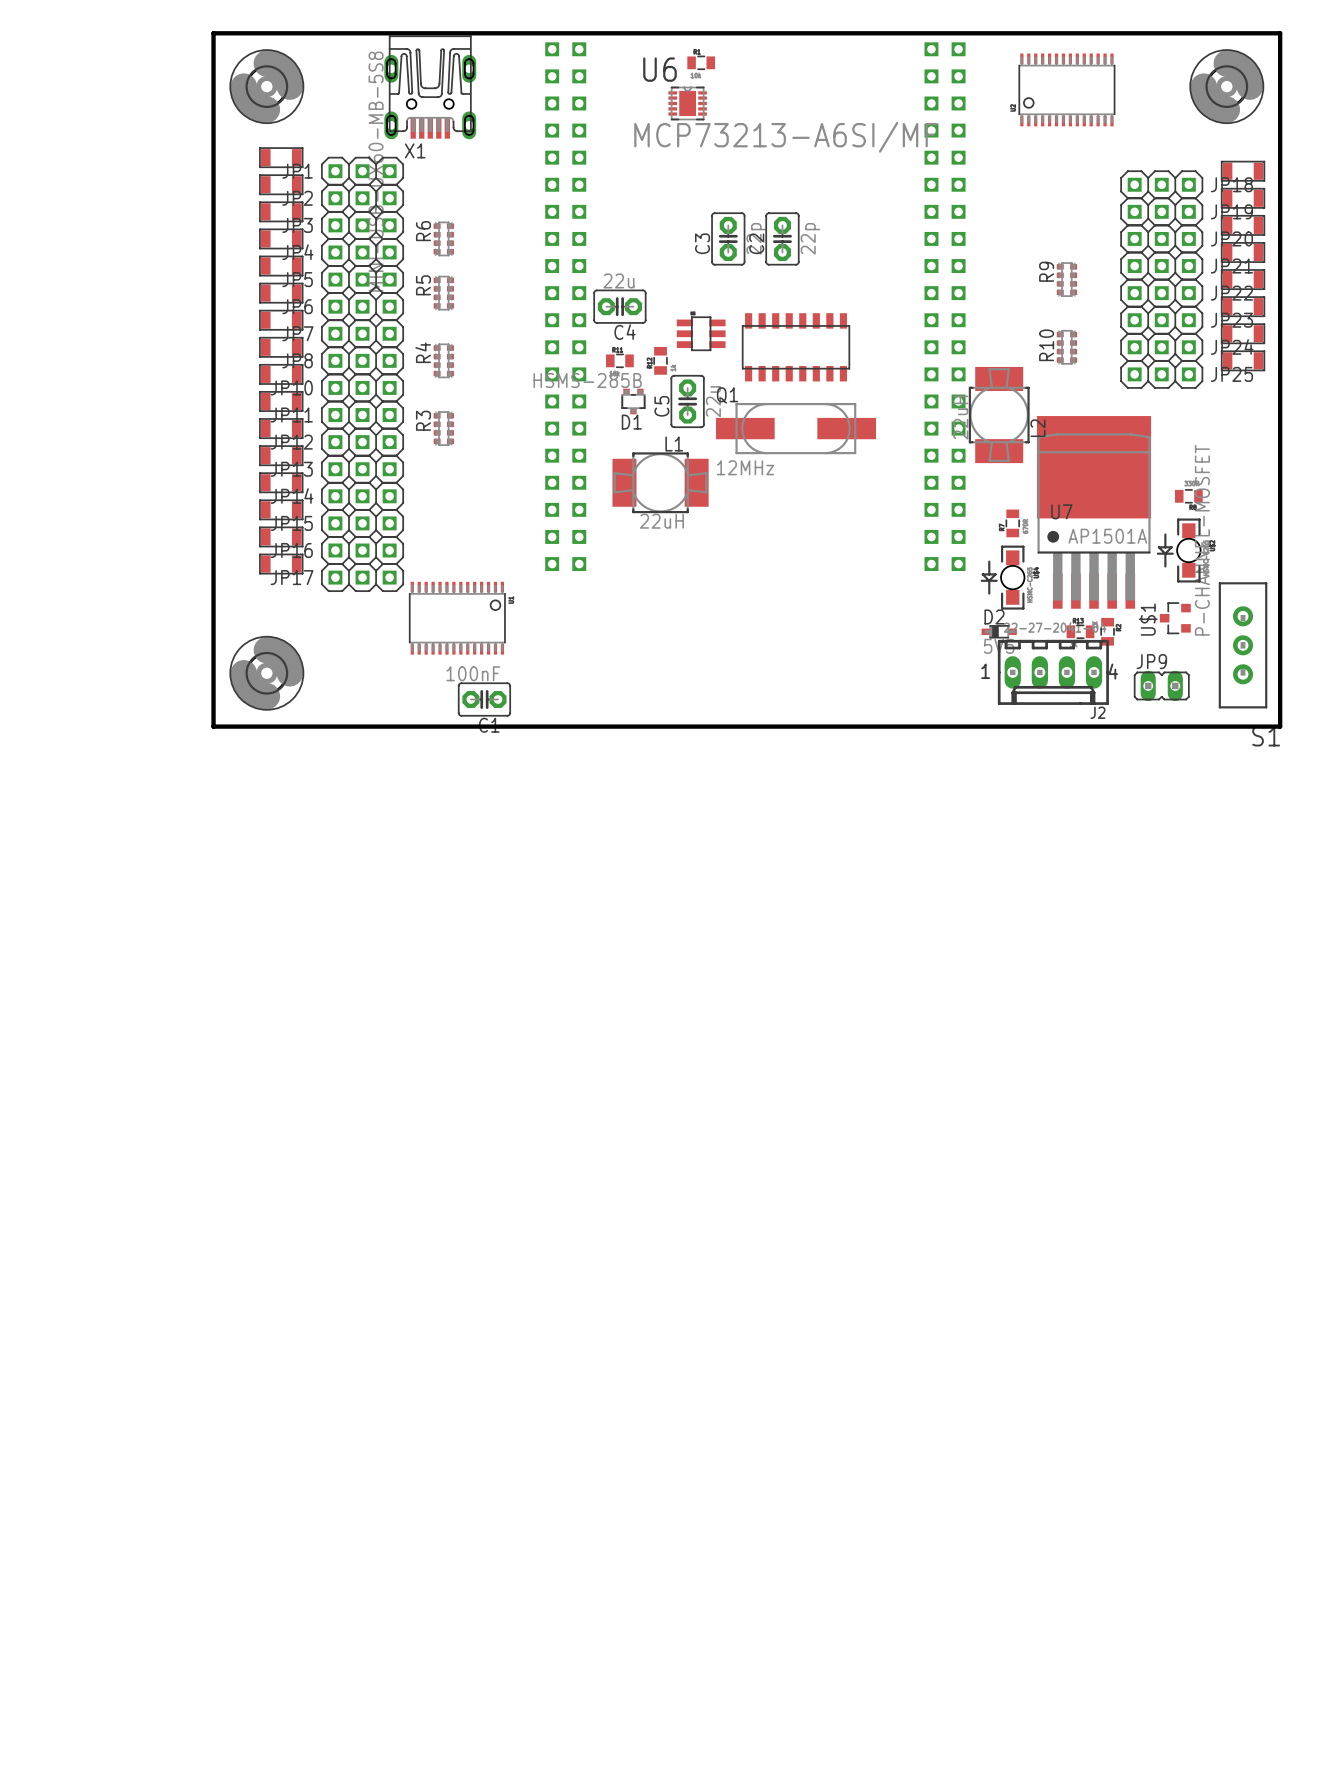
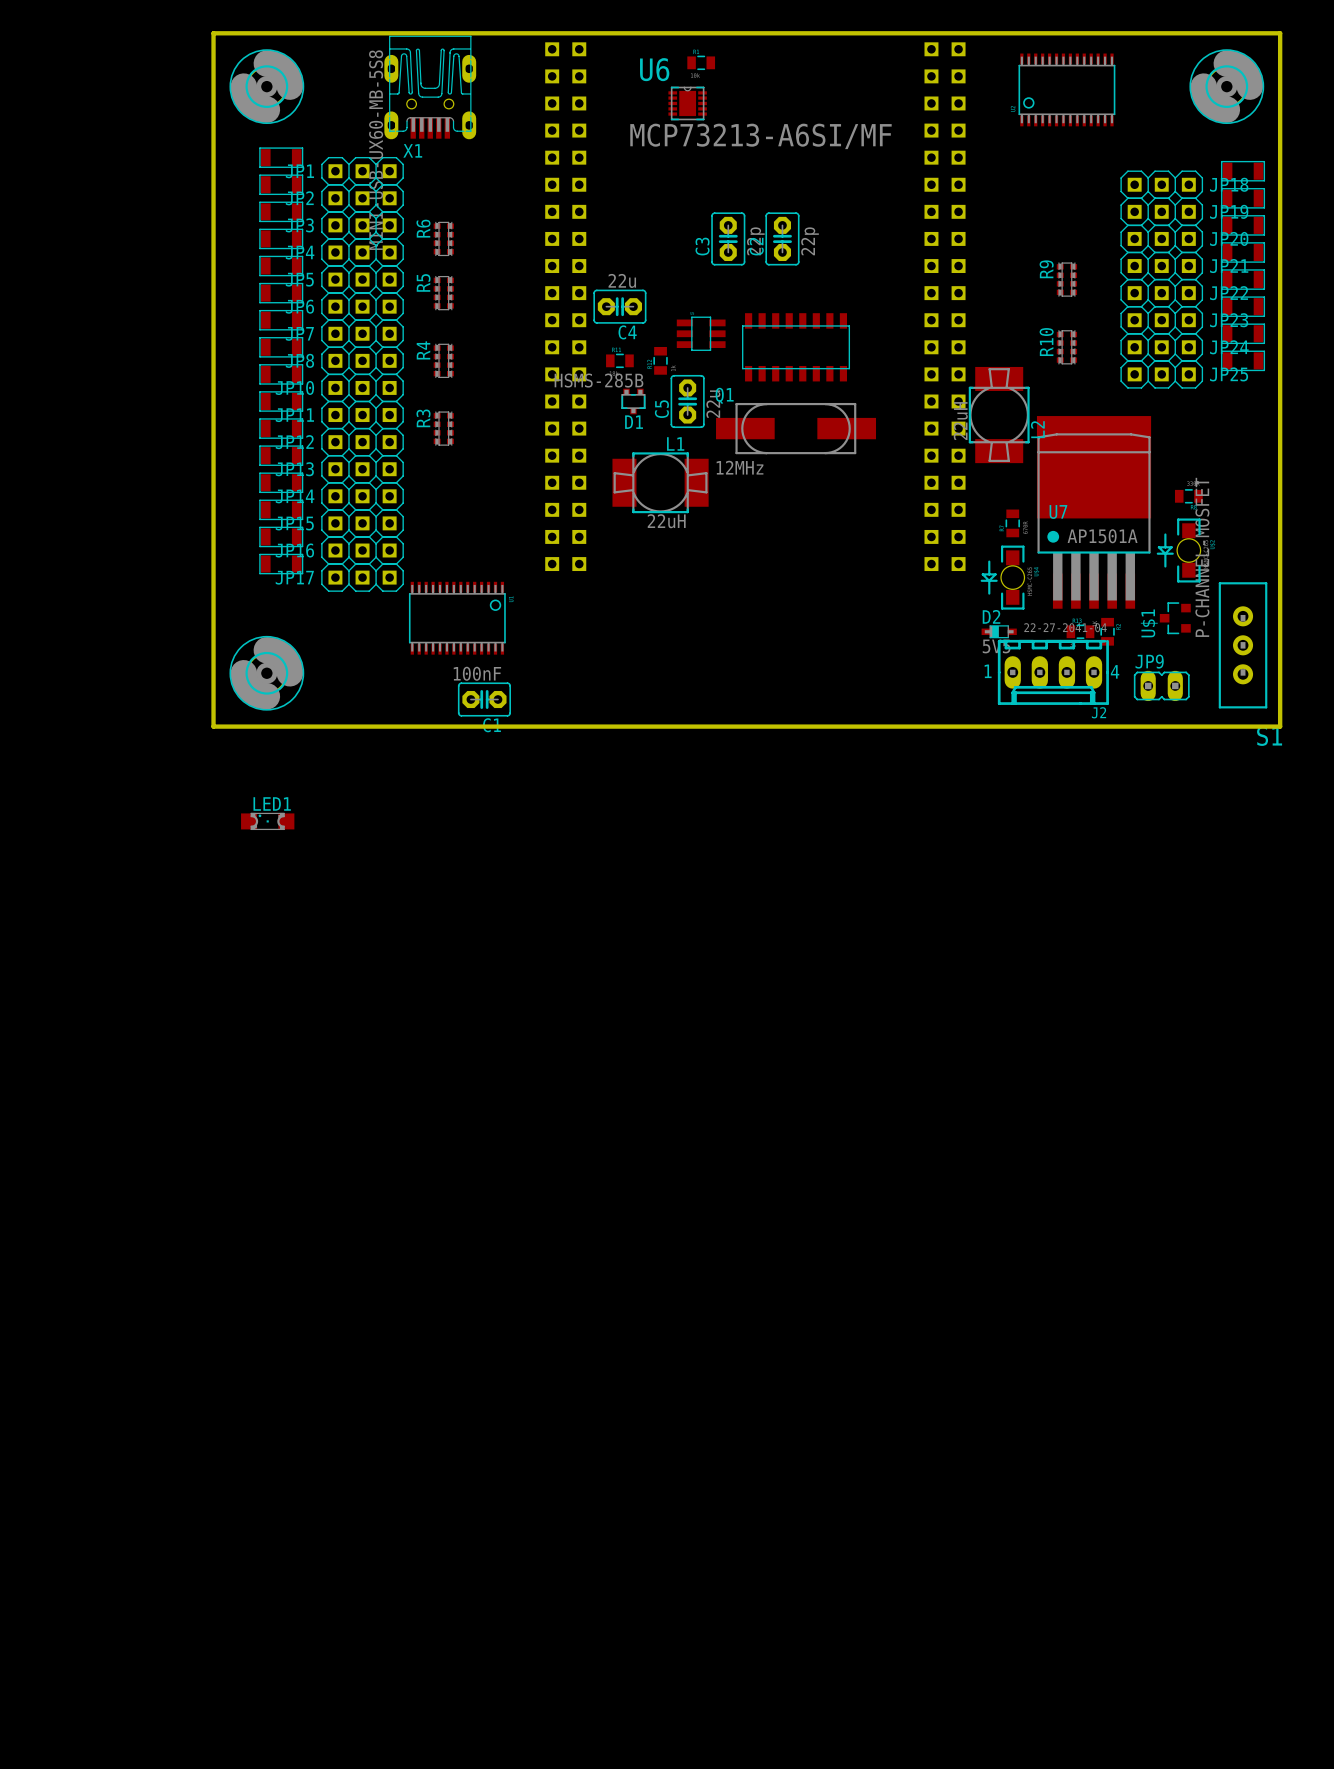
LED1: none -> (267, 821)

